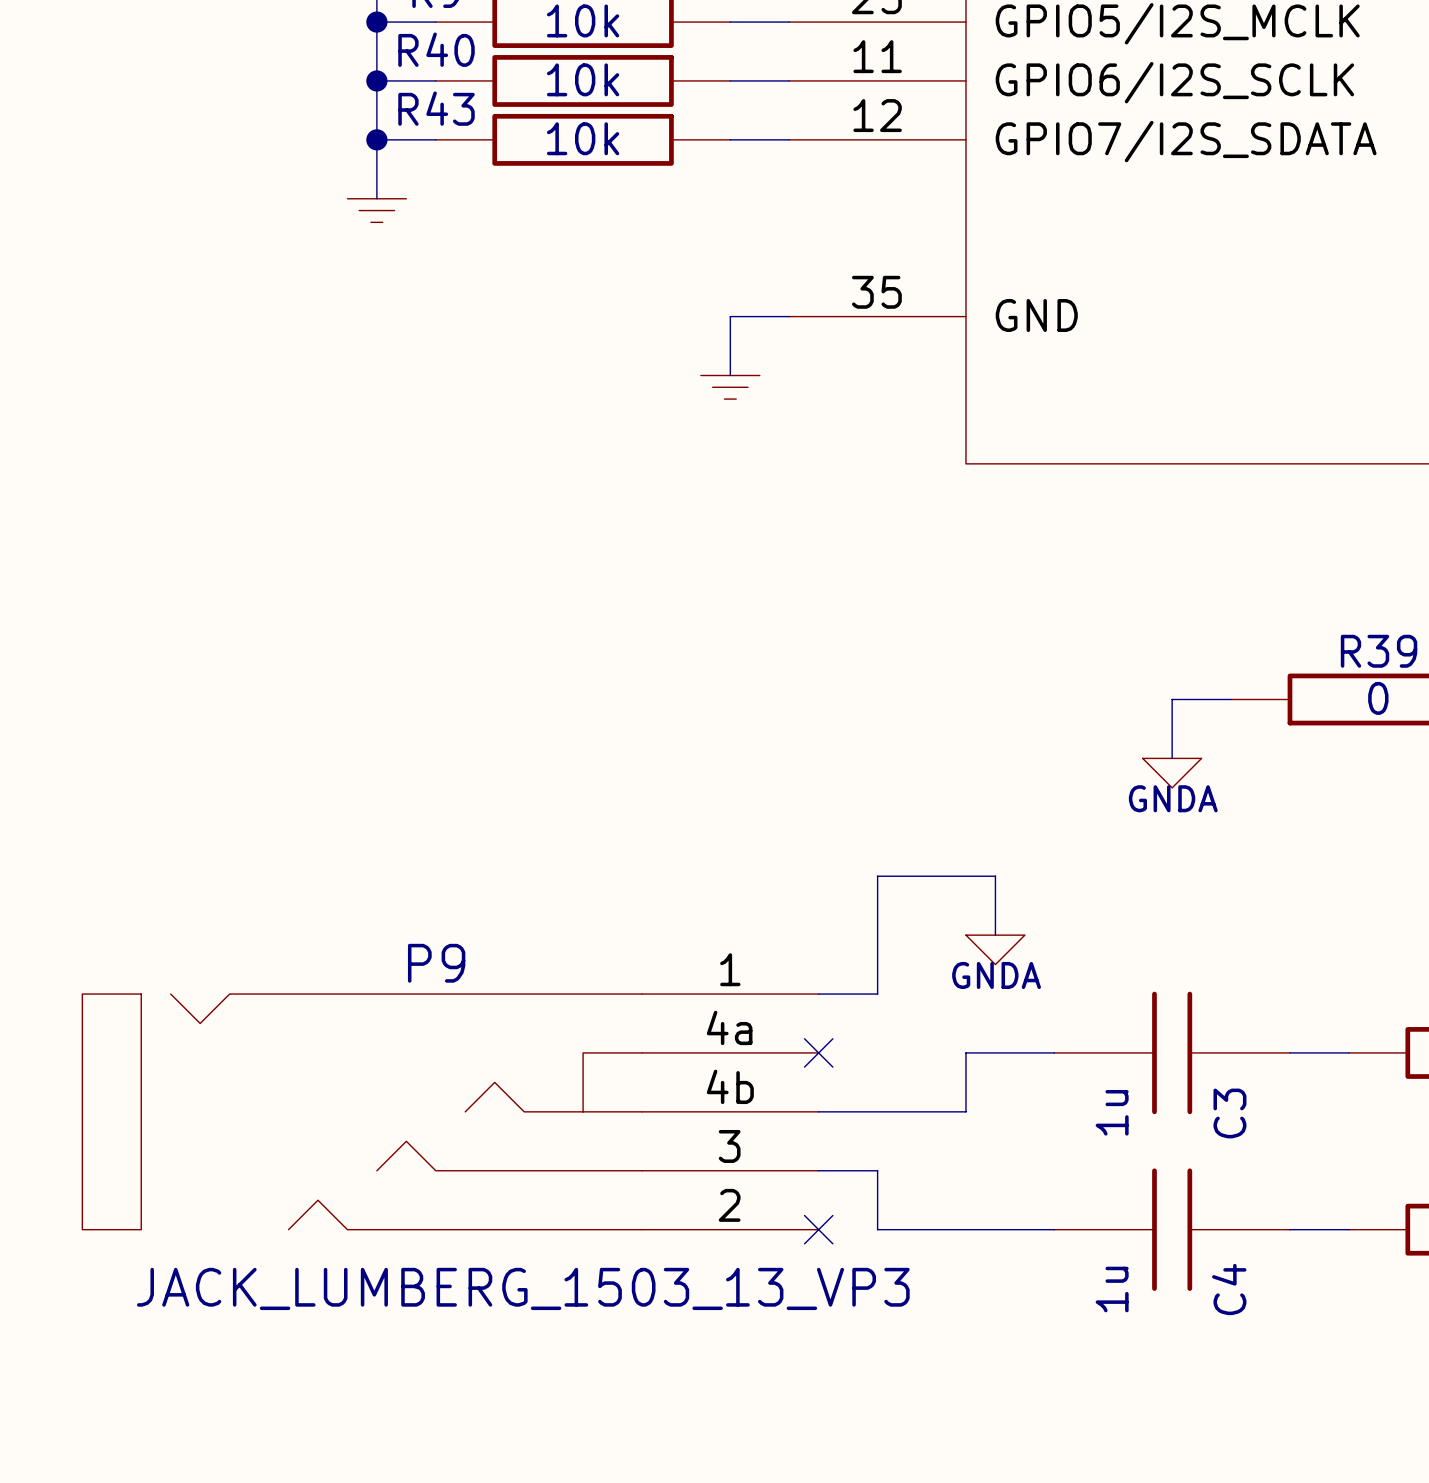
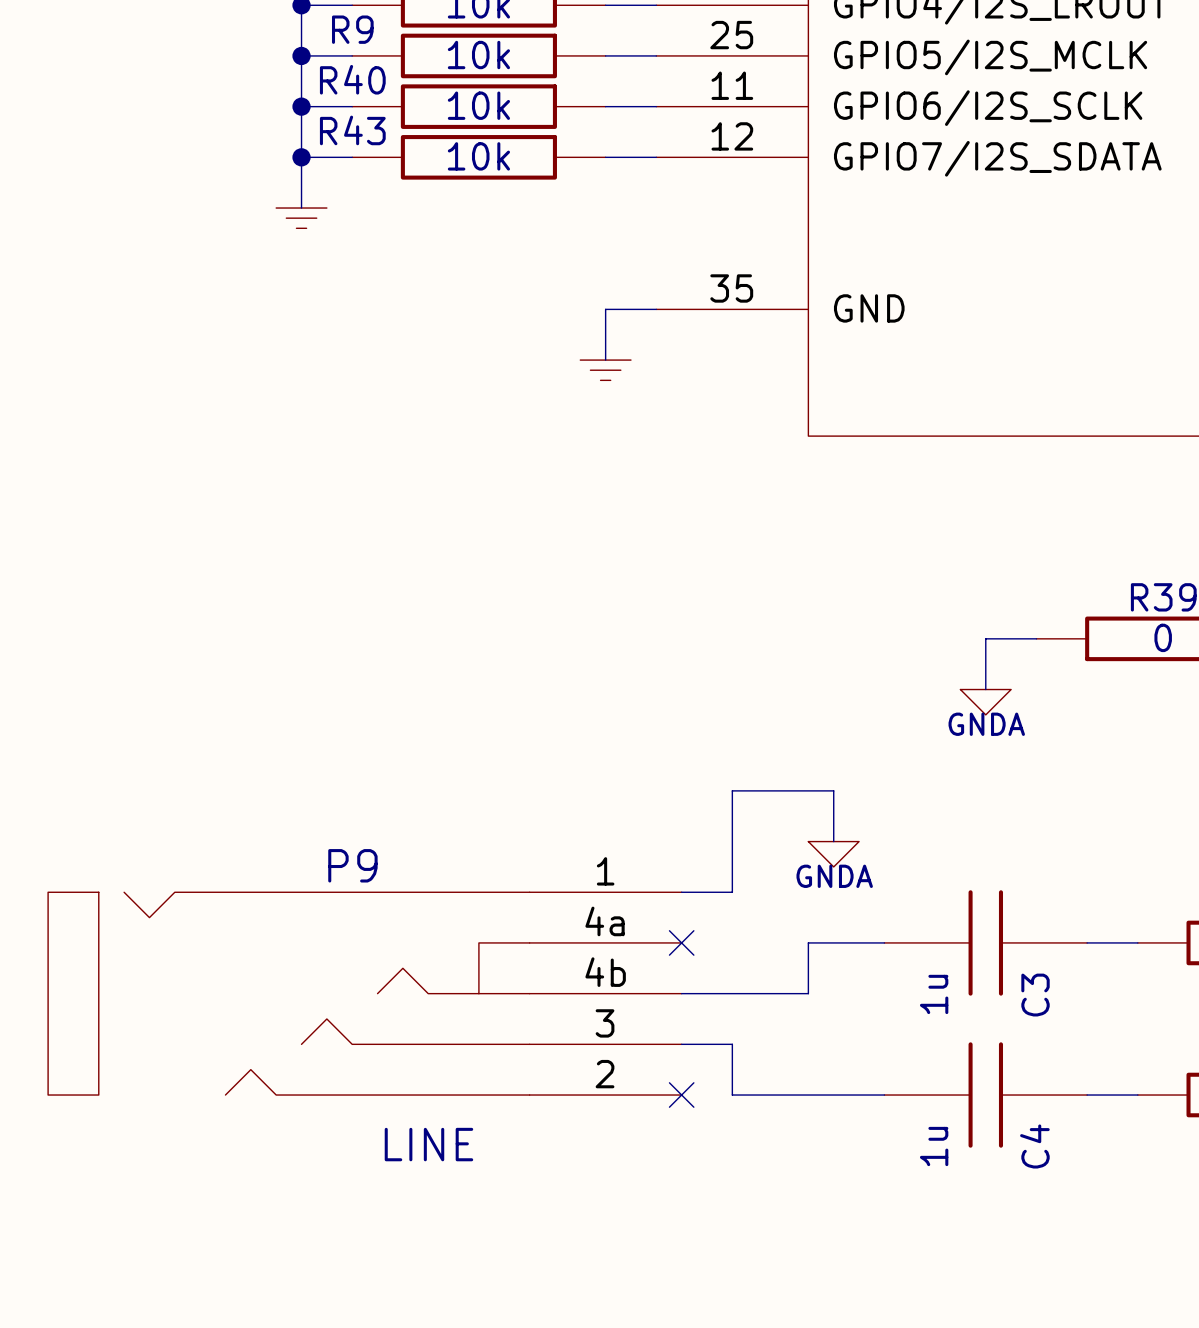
P9 value: JACK_LUMBERG_1503_13_VP3 (523, 1288) -> LINE (428, 1144)

